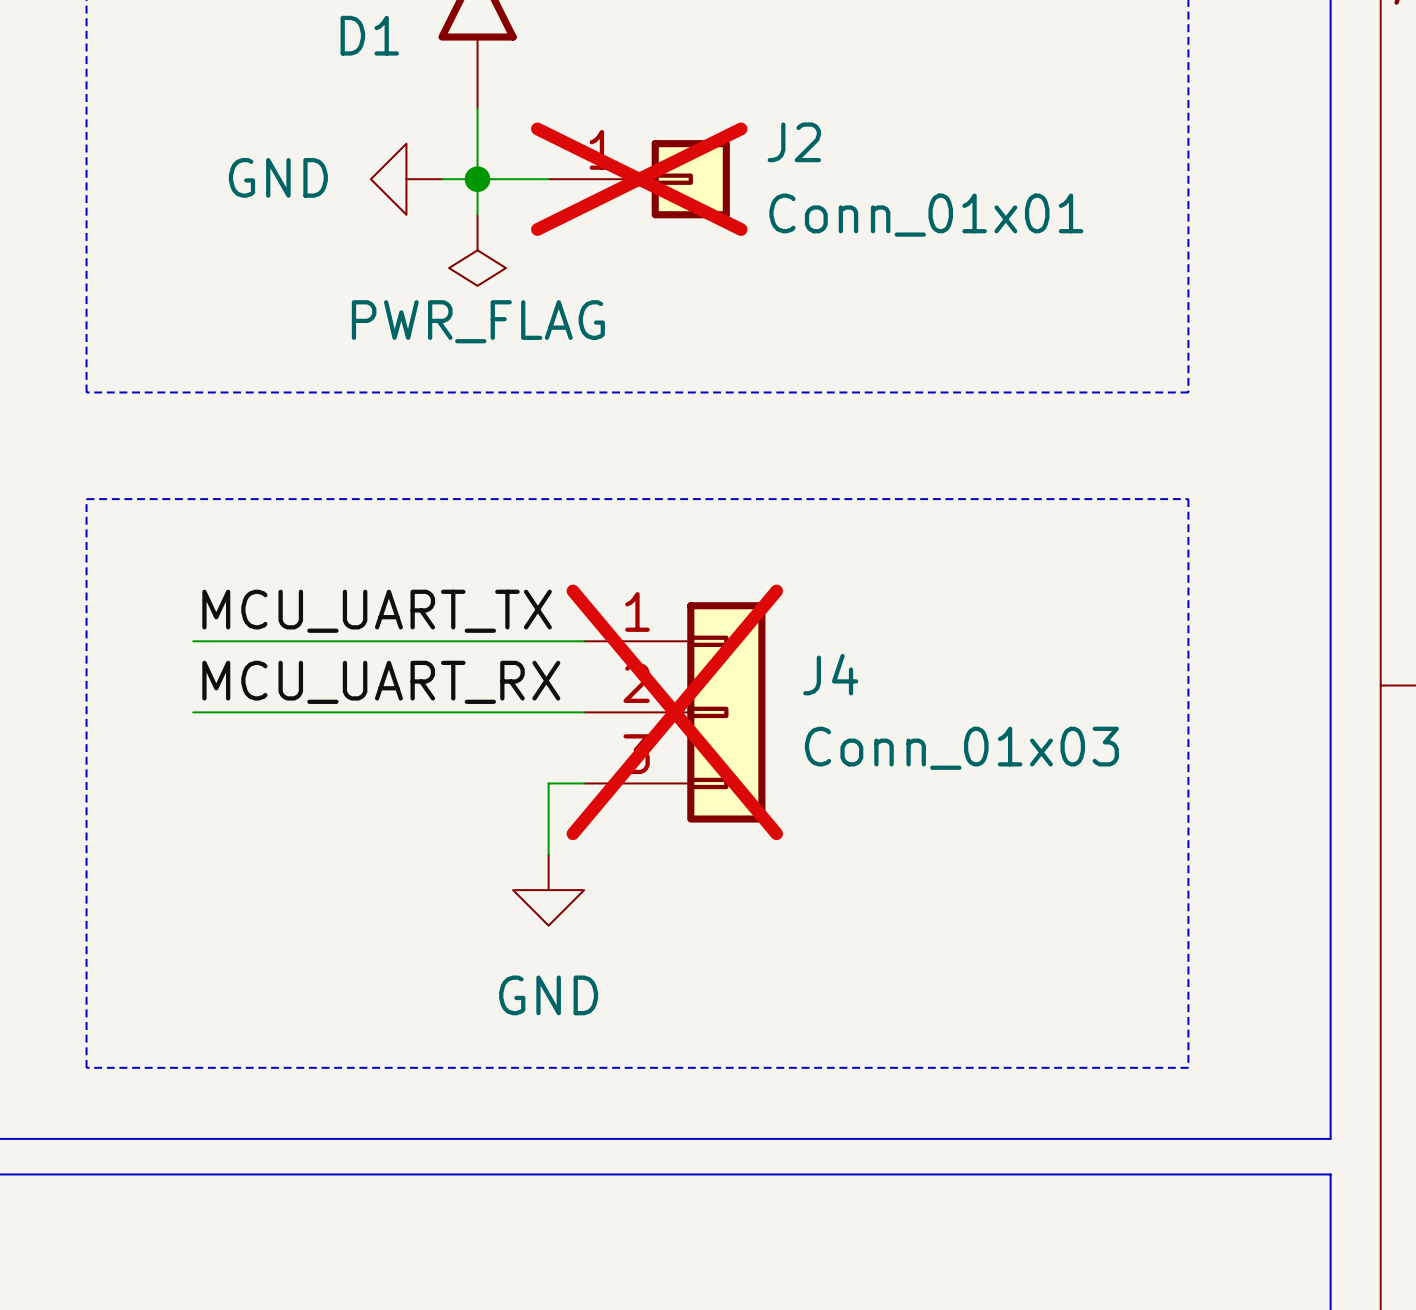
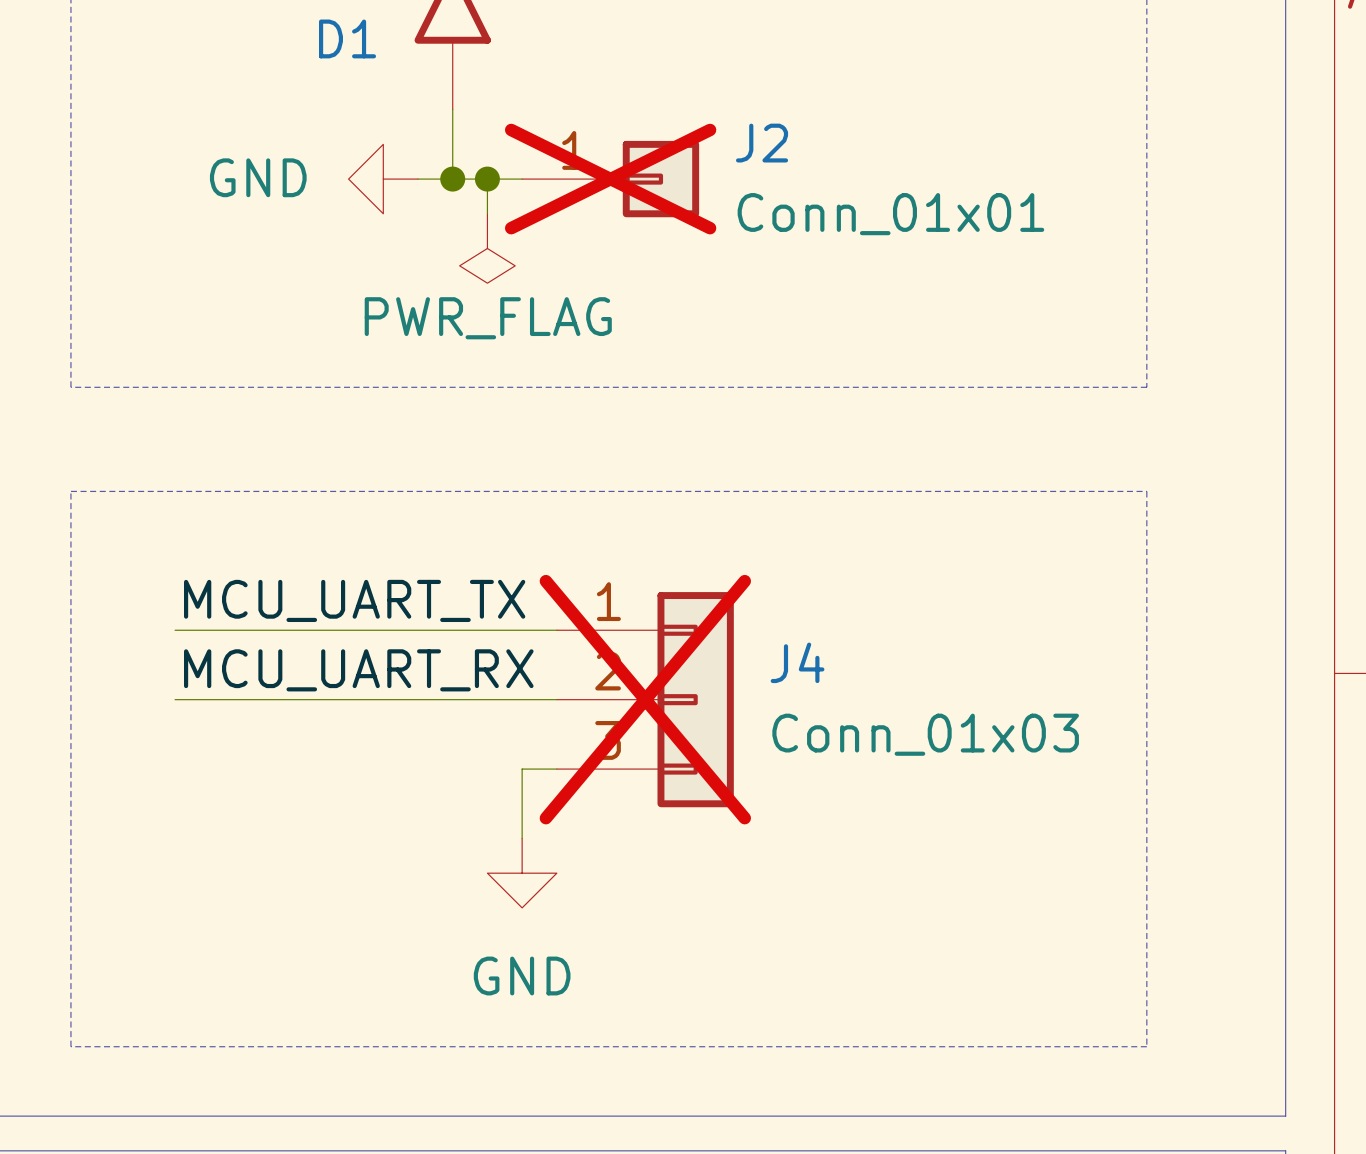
wire: (477, 179) (477, 214) -> (487, 179) (487, 213)
junction: none -> (487, 179)
power symbol position: PWR_FLAG (477, 250) -> PWR_FLAG (487, 248)

